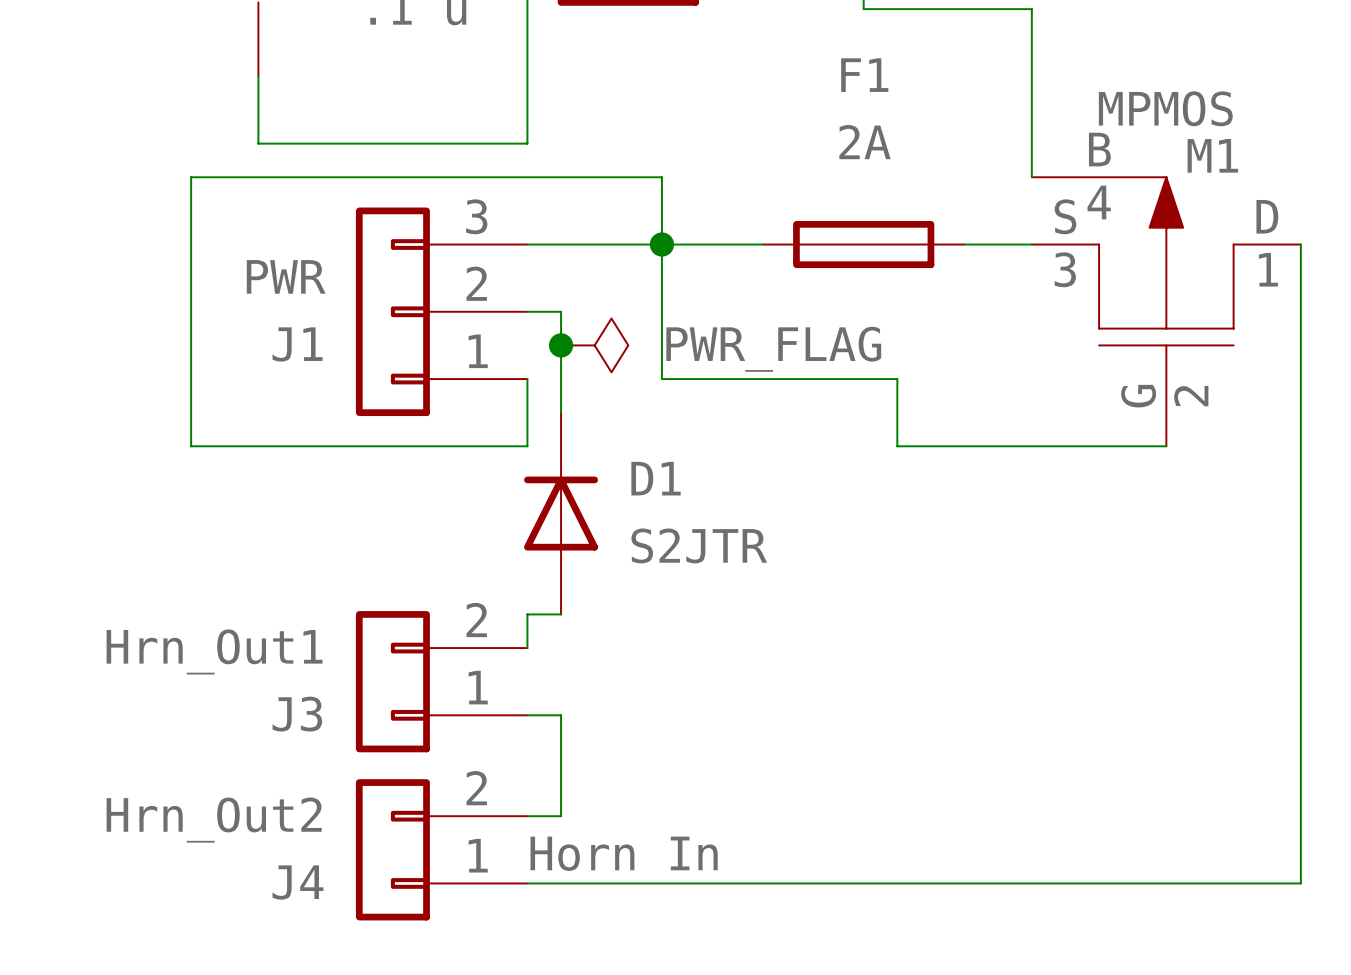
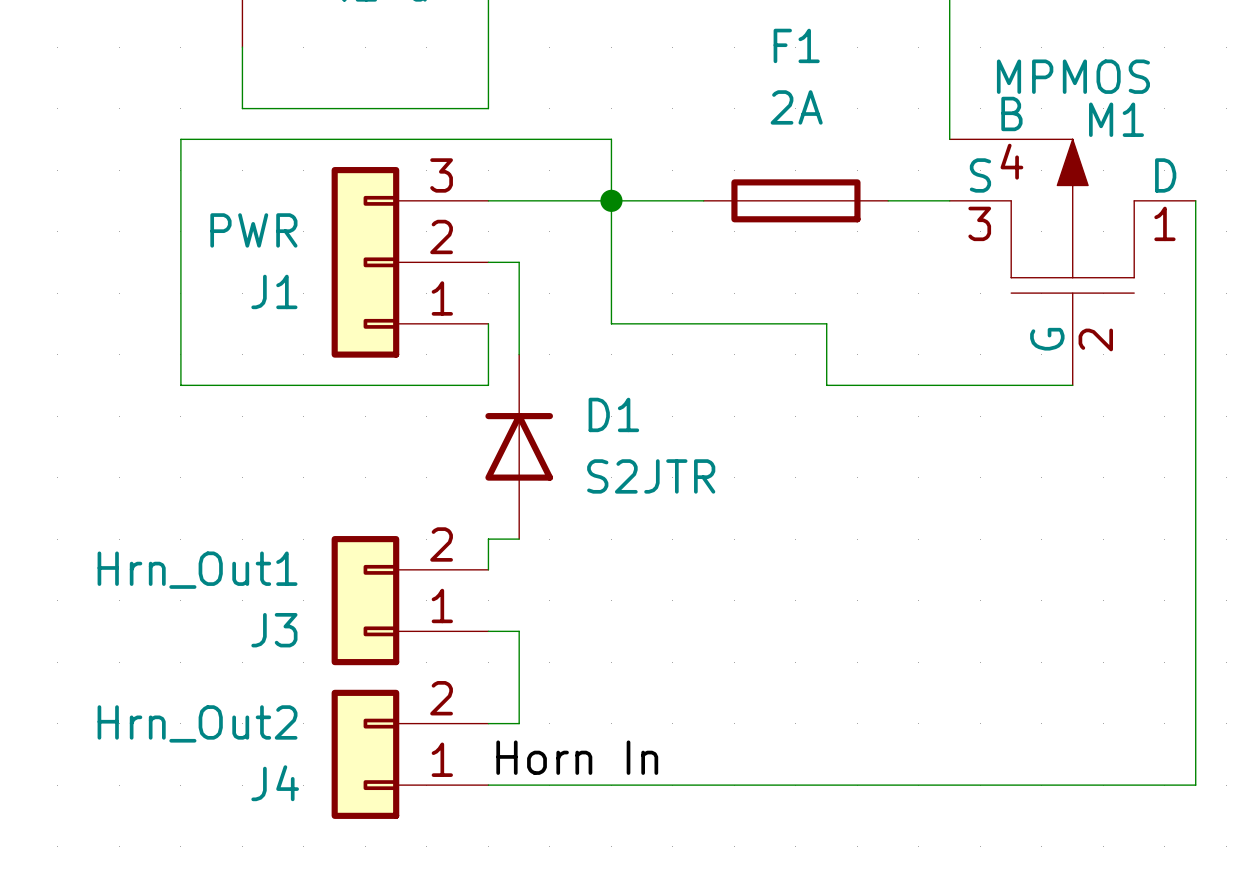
junction: (561, 345) -> none
power symbol: PWR_FLAG (594, 345) -> none

